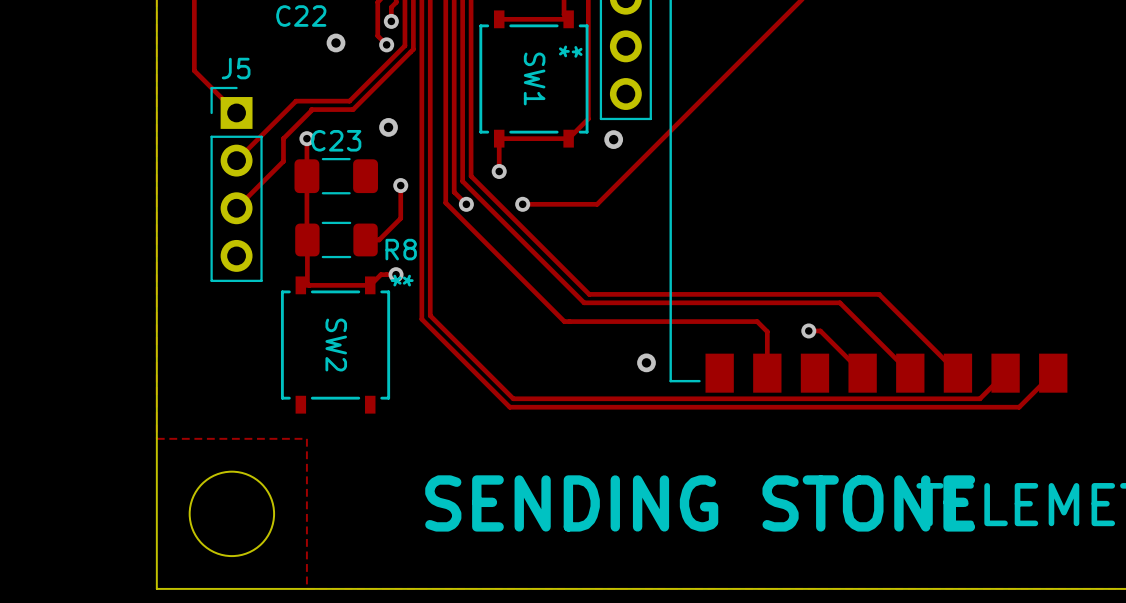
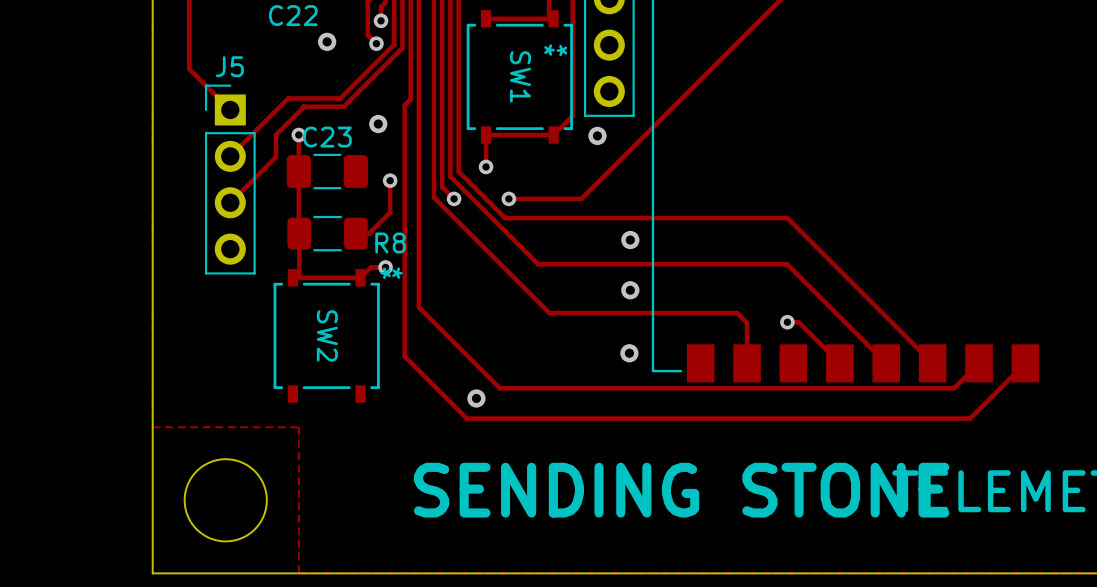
track: (421, 102) (421, 319) (509, 407) (1019, 407) -> (410, 99) (404, 105) (404, 356) (466, 418) (970, 418) (992, 396)
track: (518, 224) (589, 294) (879, 294) -> (505, 218) (787, 218) (855, 286)
via: none -> (630, 240)
track: (552, 271) (584, 302) (839, 302) -> (538, 264) (787, 264) (817, 294)
via: none -> (630, 290)
via: none -> (476, 398)

